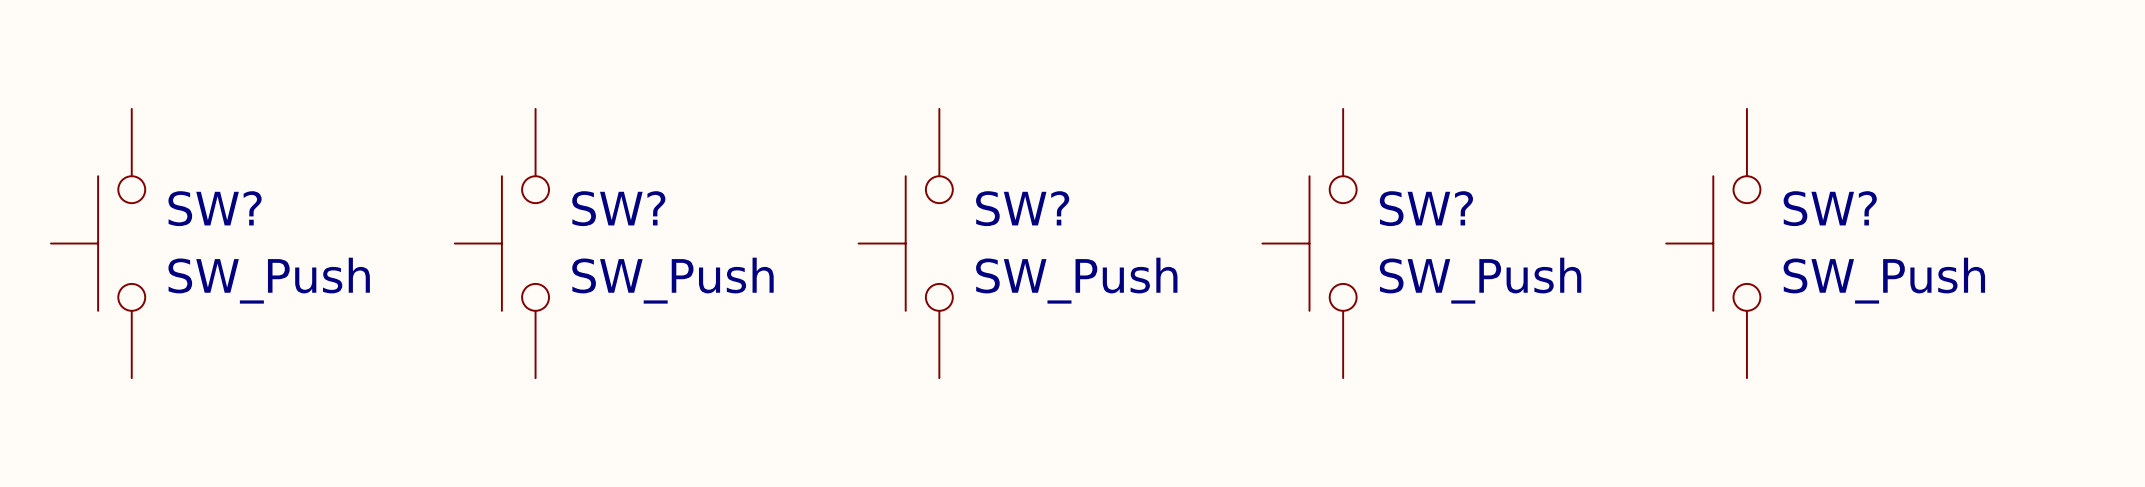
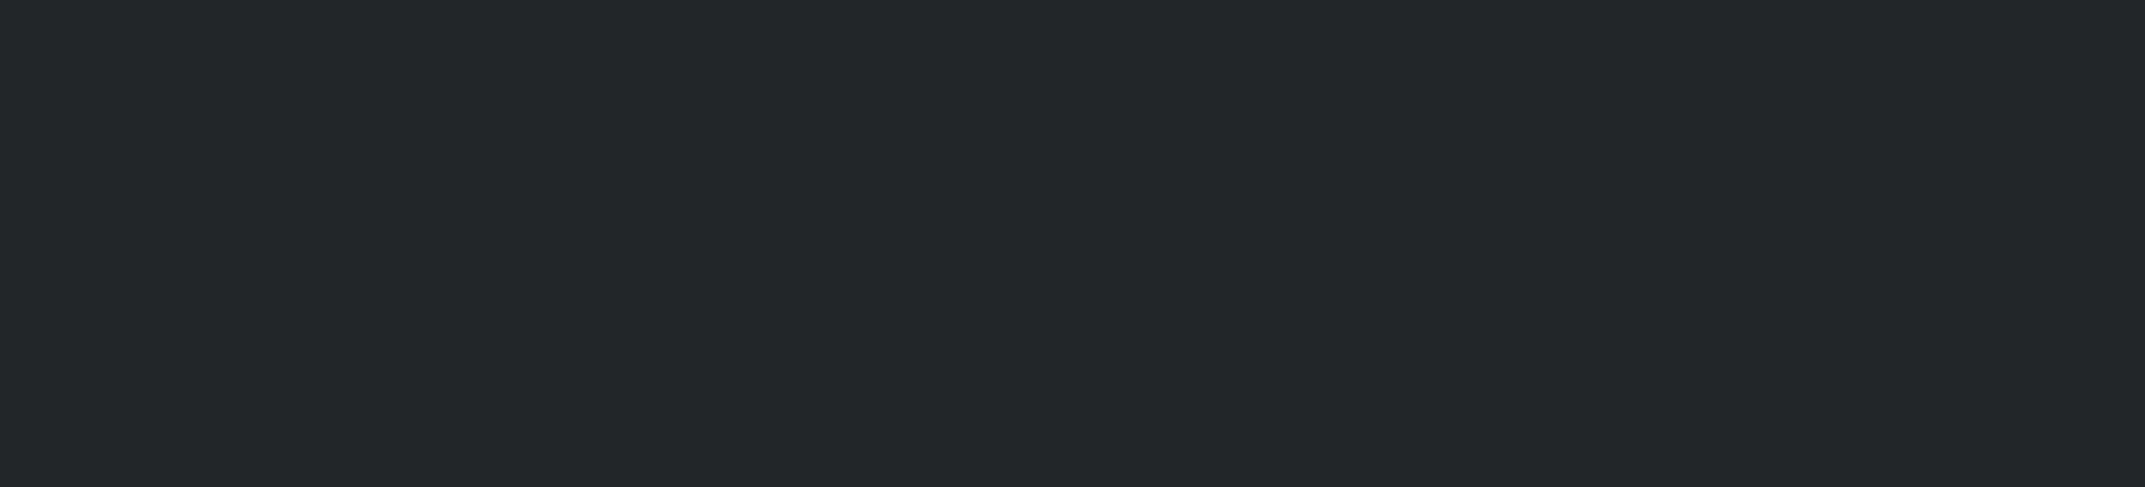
SW?: SW_Push (98, 243) -> none
SW?: SW_Push (501, 243) -> none
SW?: SW_Push (905, 243) -> none
SW?: SW_Push (1309, 243) -> none
SW?: SW_Push (1713, 243) -> none

